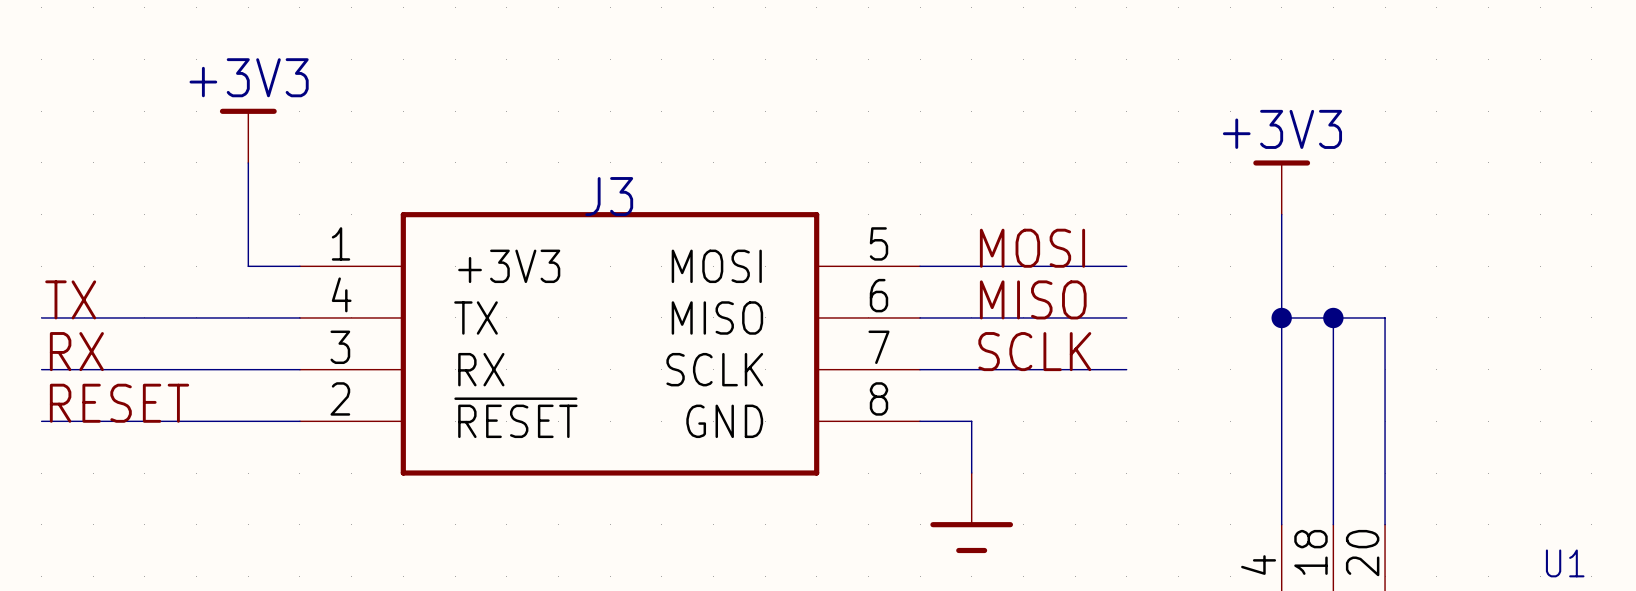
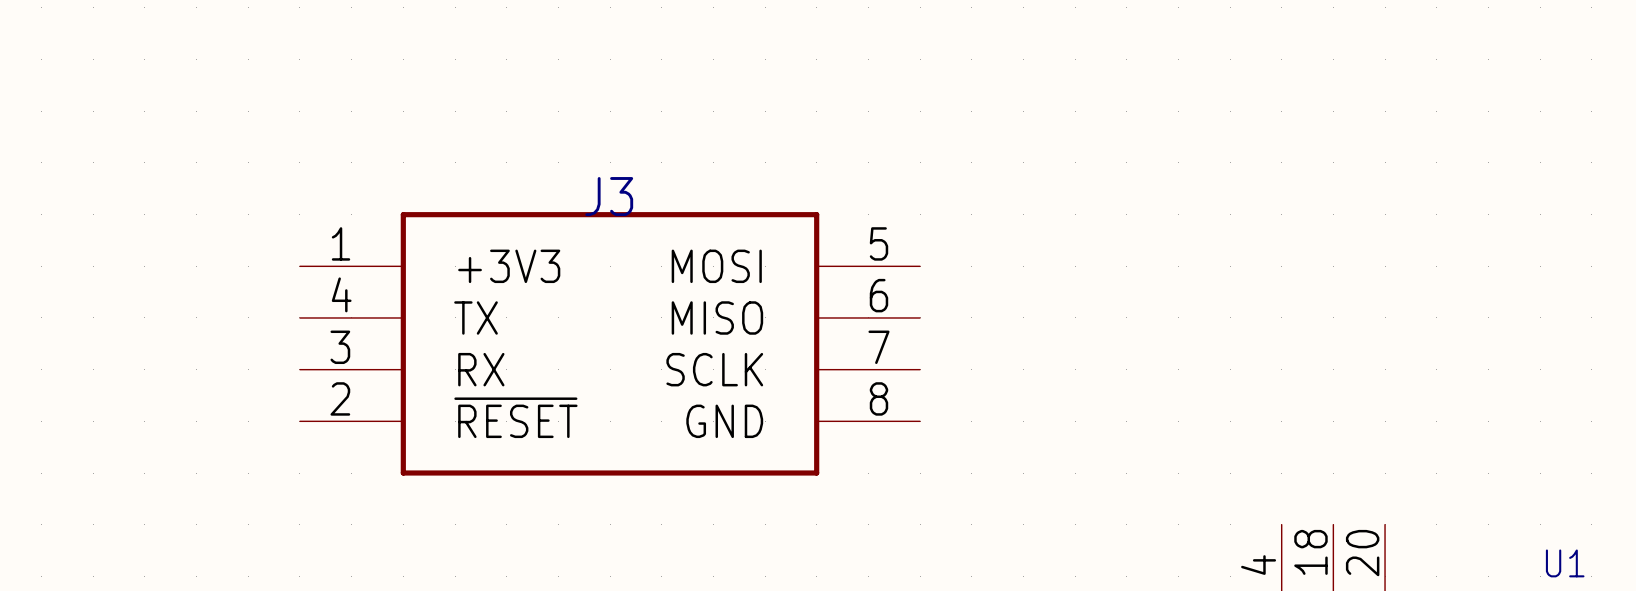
power symbol: +3V3 (248, 135) -> none
wire: (248, 162) (248, 266) (299, 266) -> none
power symbol: +3V3 (1281, 187) -> none
wire: (1281, 214) (1281, 524) -> none
label: MOSI (1032, 248) -> none
wire: (920, 266) (1126, 266) -> none
label: TX (70, 299) -> none
label: MISO (1033, 299) -> none
wire: (41, 317) (299, 317) -> none
wire: (920, 317) (1126, 317) -> none
wire: (1281, 317) (1385, 317) (1385, 524) -> none
junction: (1281, 317) -> none
wire: (1333, 317) (1333, 524) -> none
junction: (1333, 317) -> none
label: RX (76, 351) -> none
label: SCLK (1034, 351) -> none
wire: (41, 369) (299, 369) -> none
wire: (920, 369) (1126, 369) -> none
label: RESET (119, 403) -> none
wire: (41, 421) (299, 421) -> none
wire: (920, 421) (971, 421) (971, 473) -> none
power symbol: (971, 513) -> none

